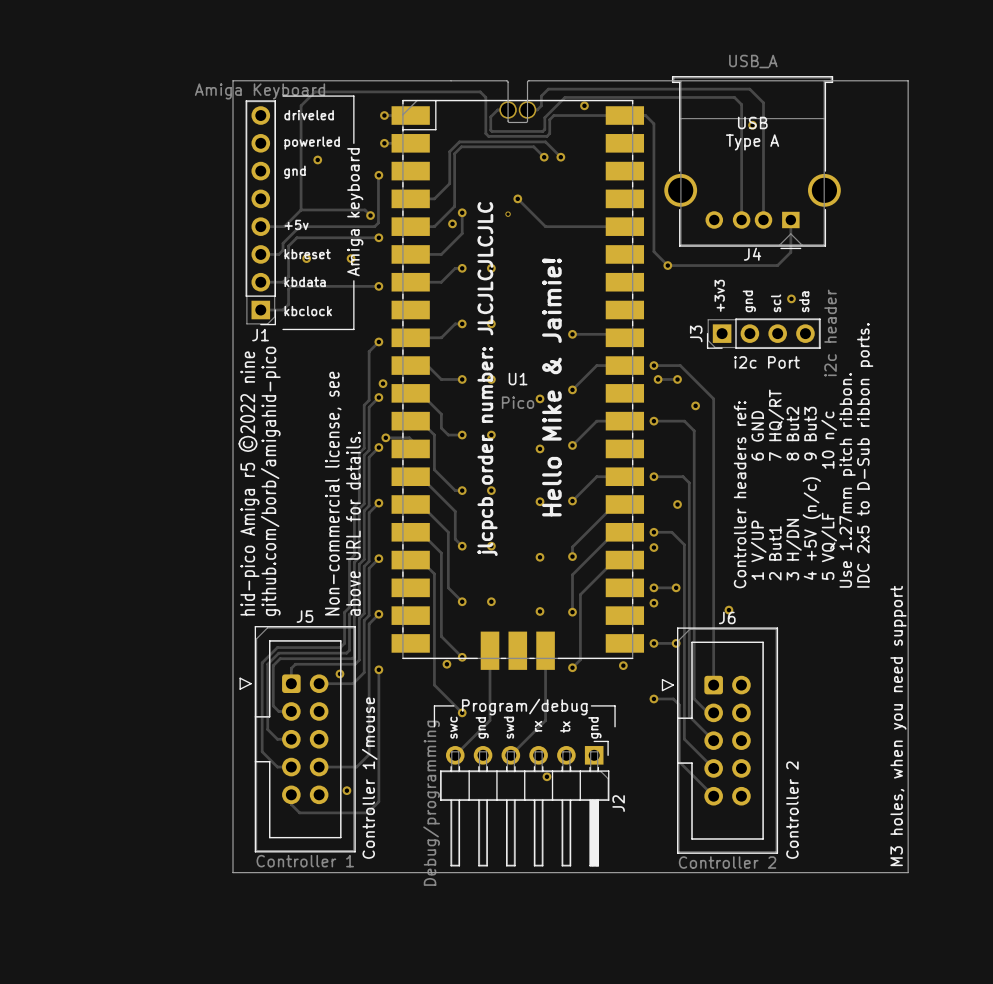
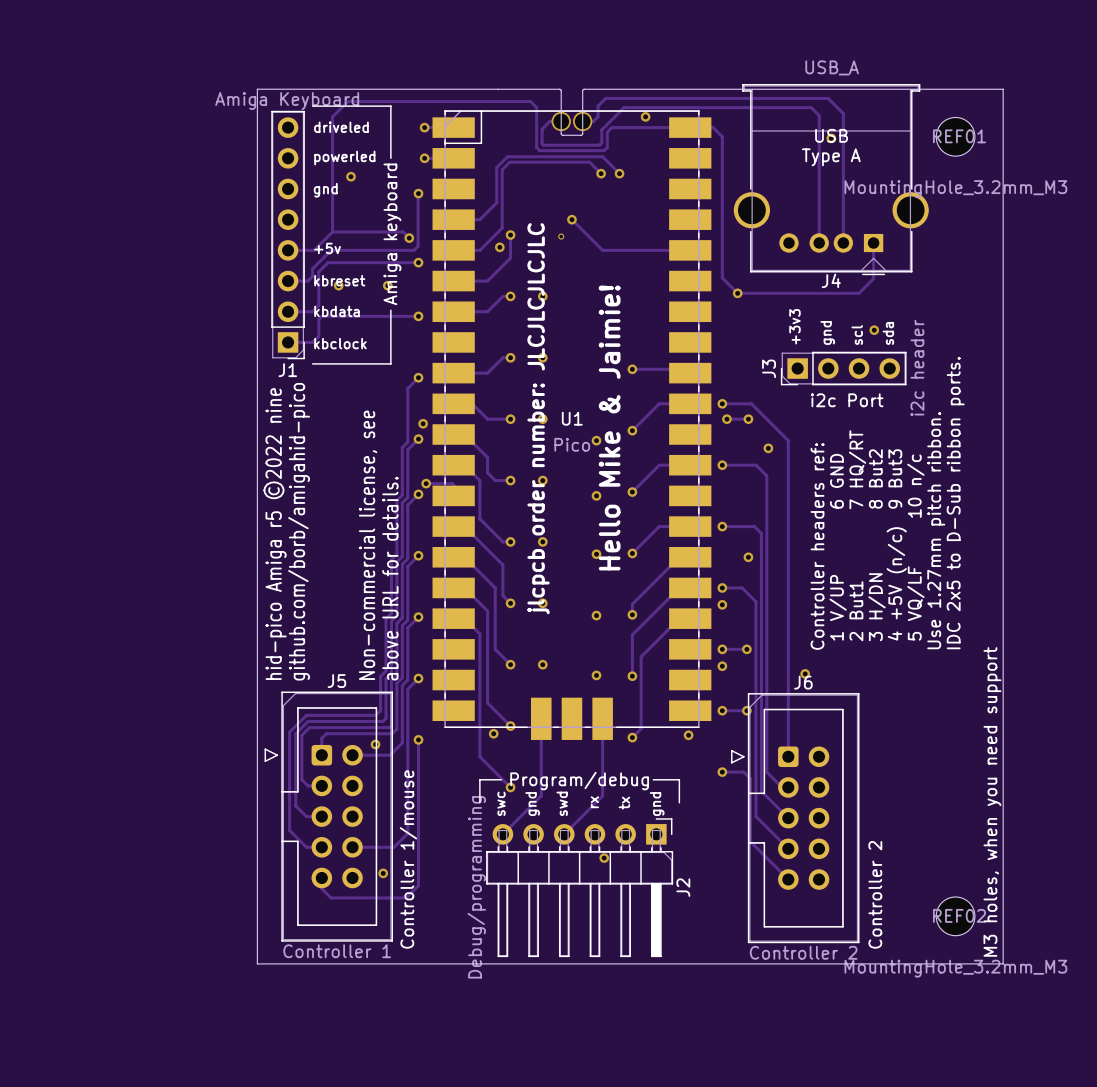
REF01: none -> MountingHole_3.2mm_M3 (955, 136)
REF02: none -> MountingHole_3.2mm_M3 (955, 916)

